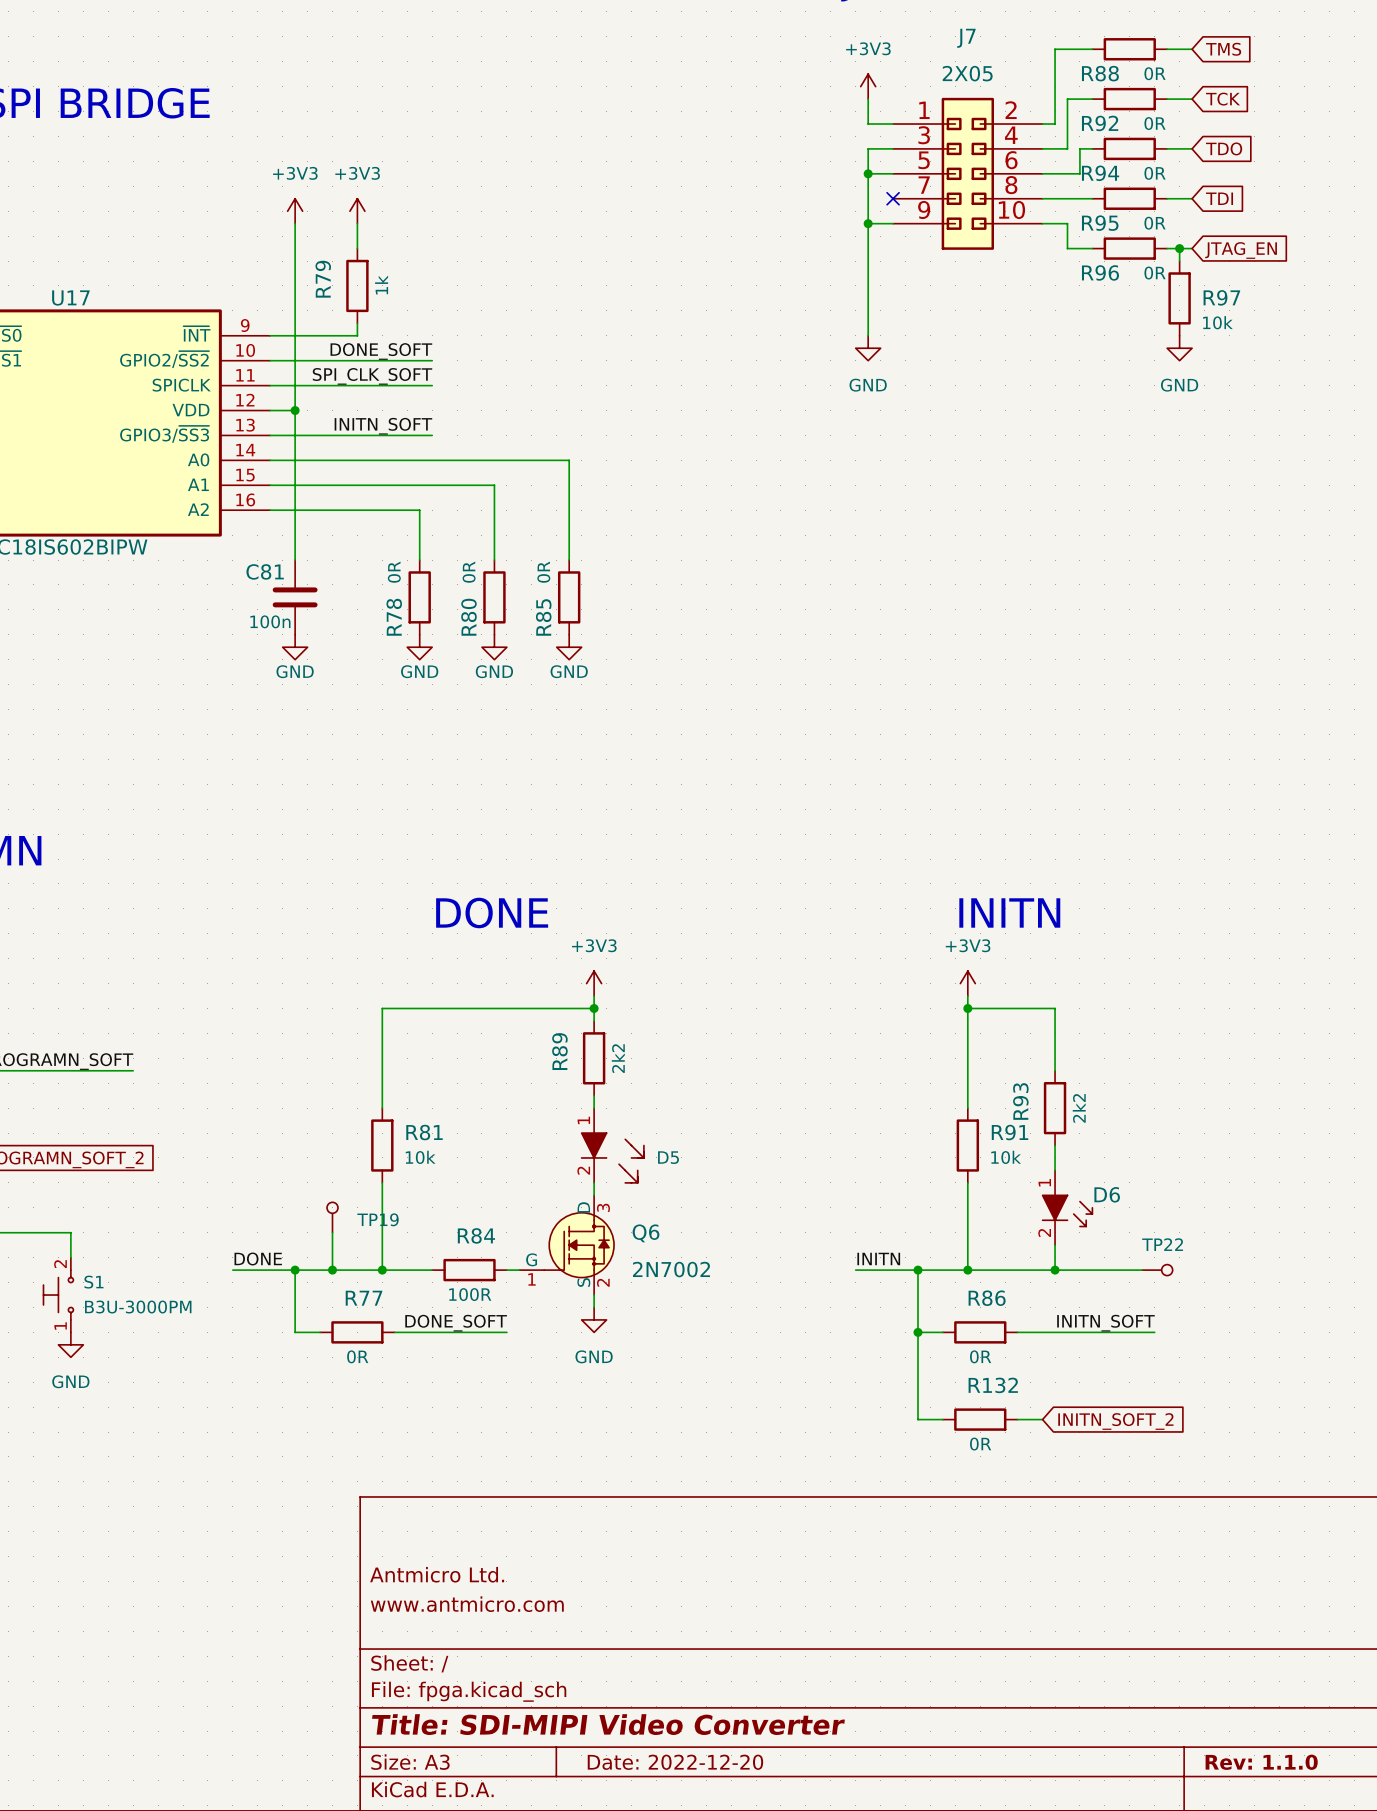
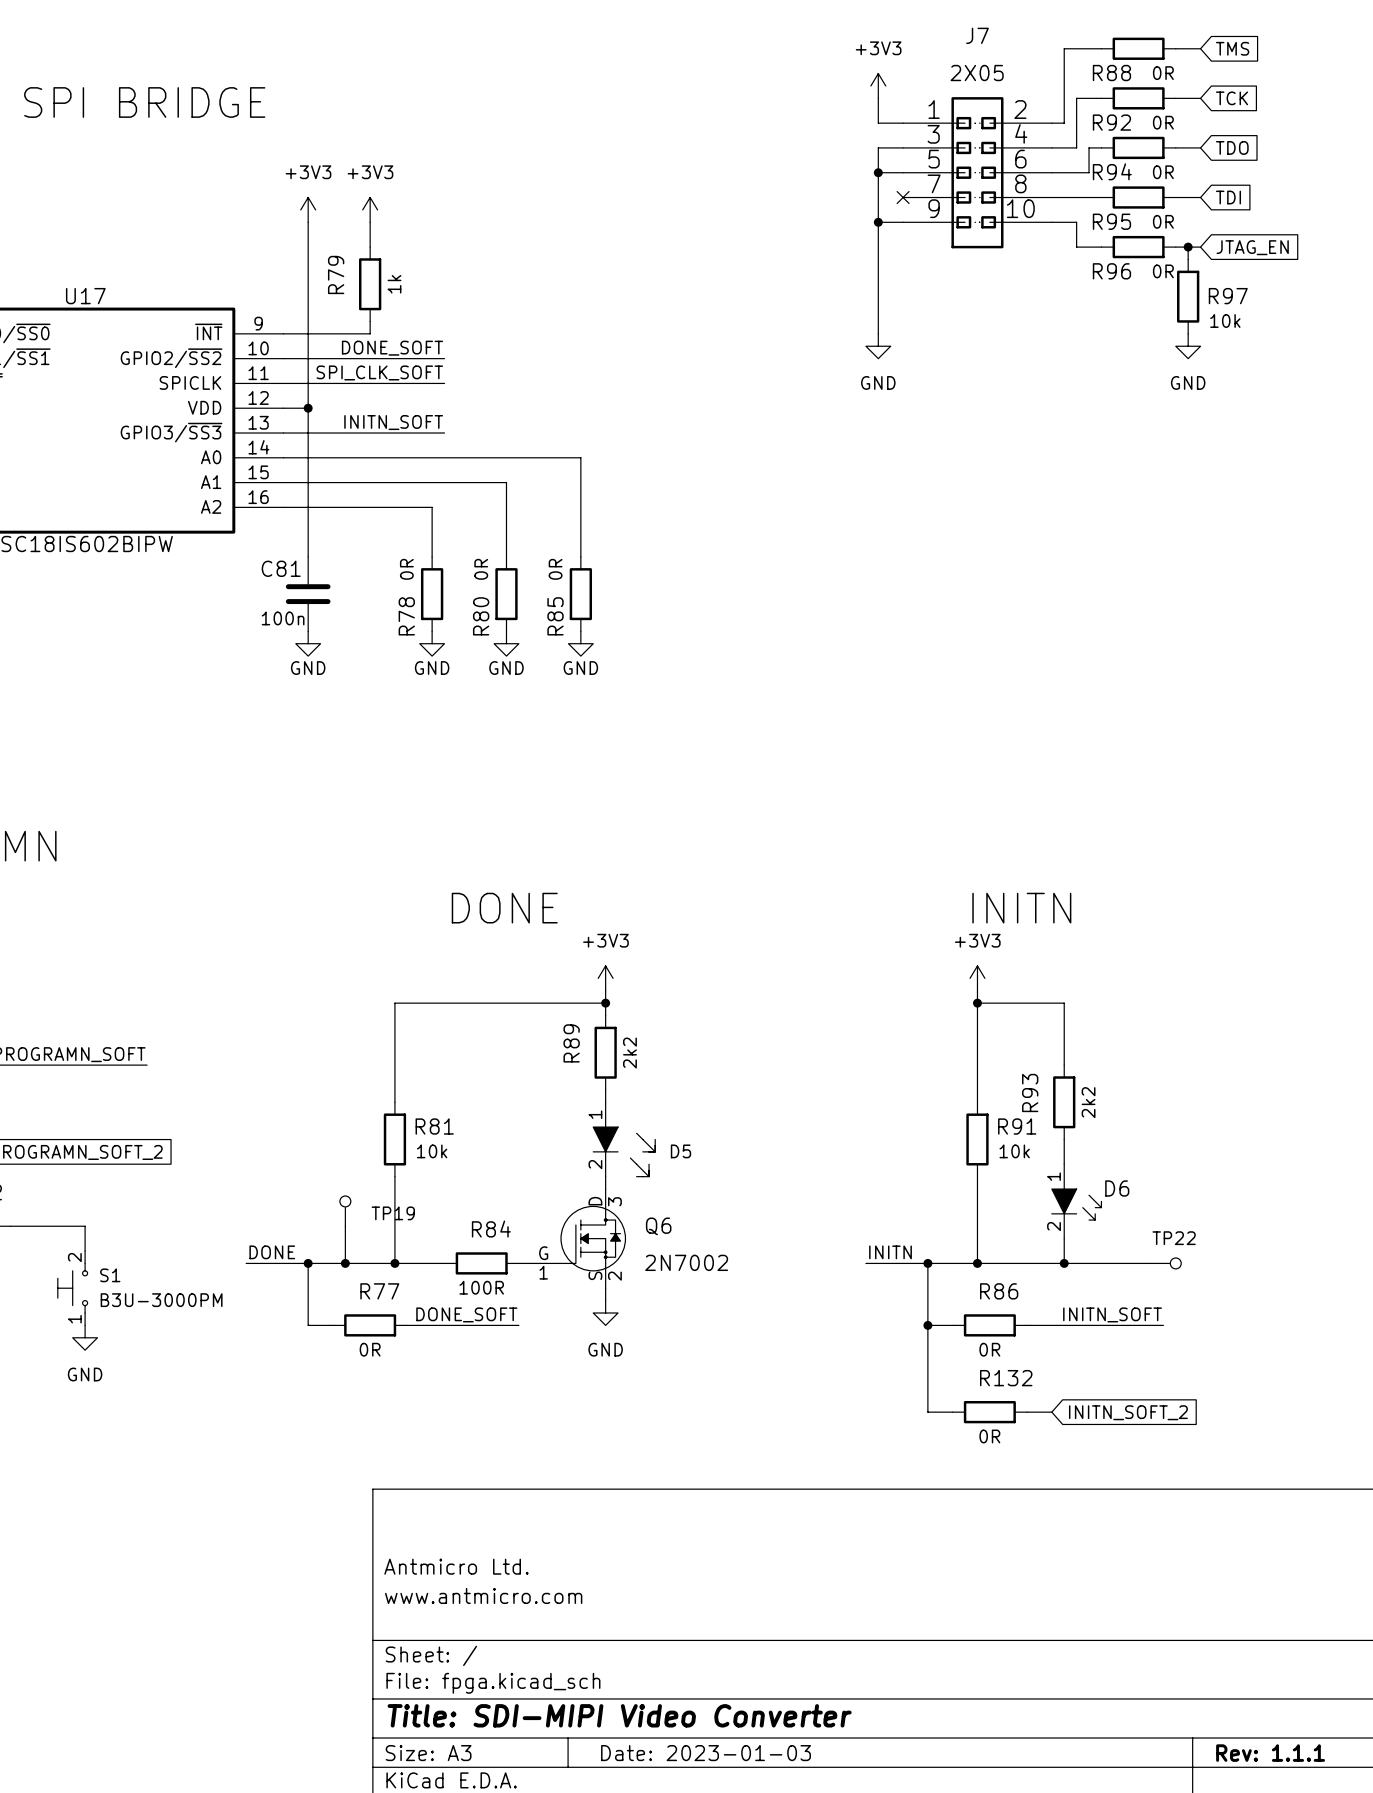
title block: Date: 2022-12-20 (675, 1762) -> Date: 2023-01-03 (706, 1753)
title block: Rev: 1.1.0 (1261, 1762) -> Rev: 1.1.1 (1270, 1753)

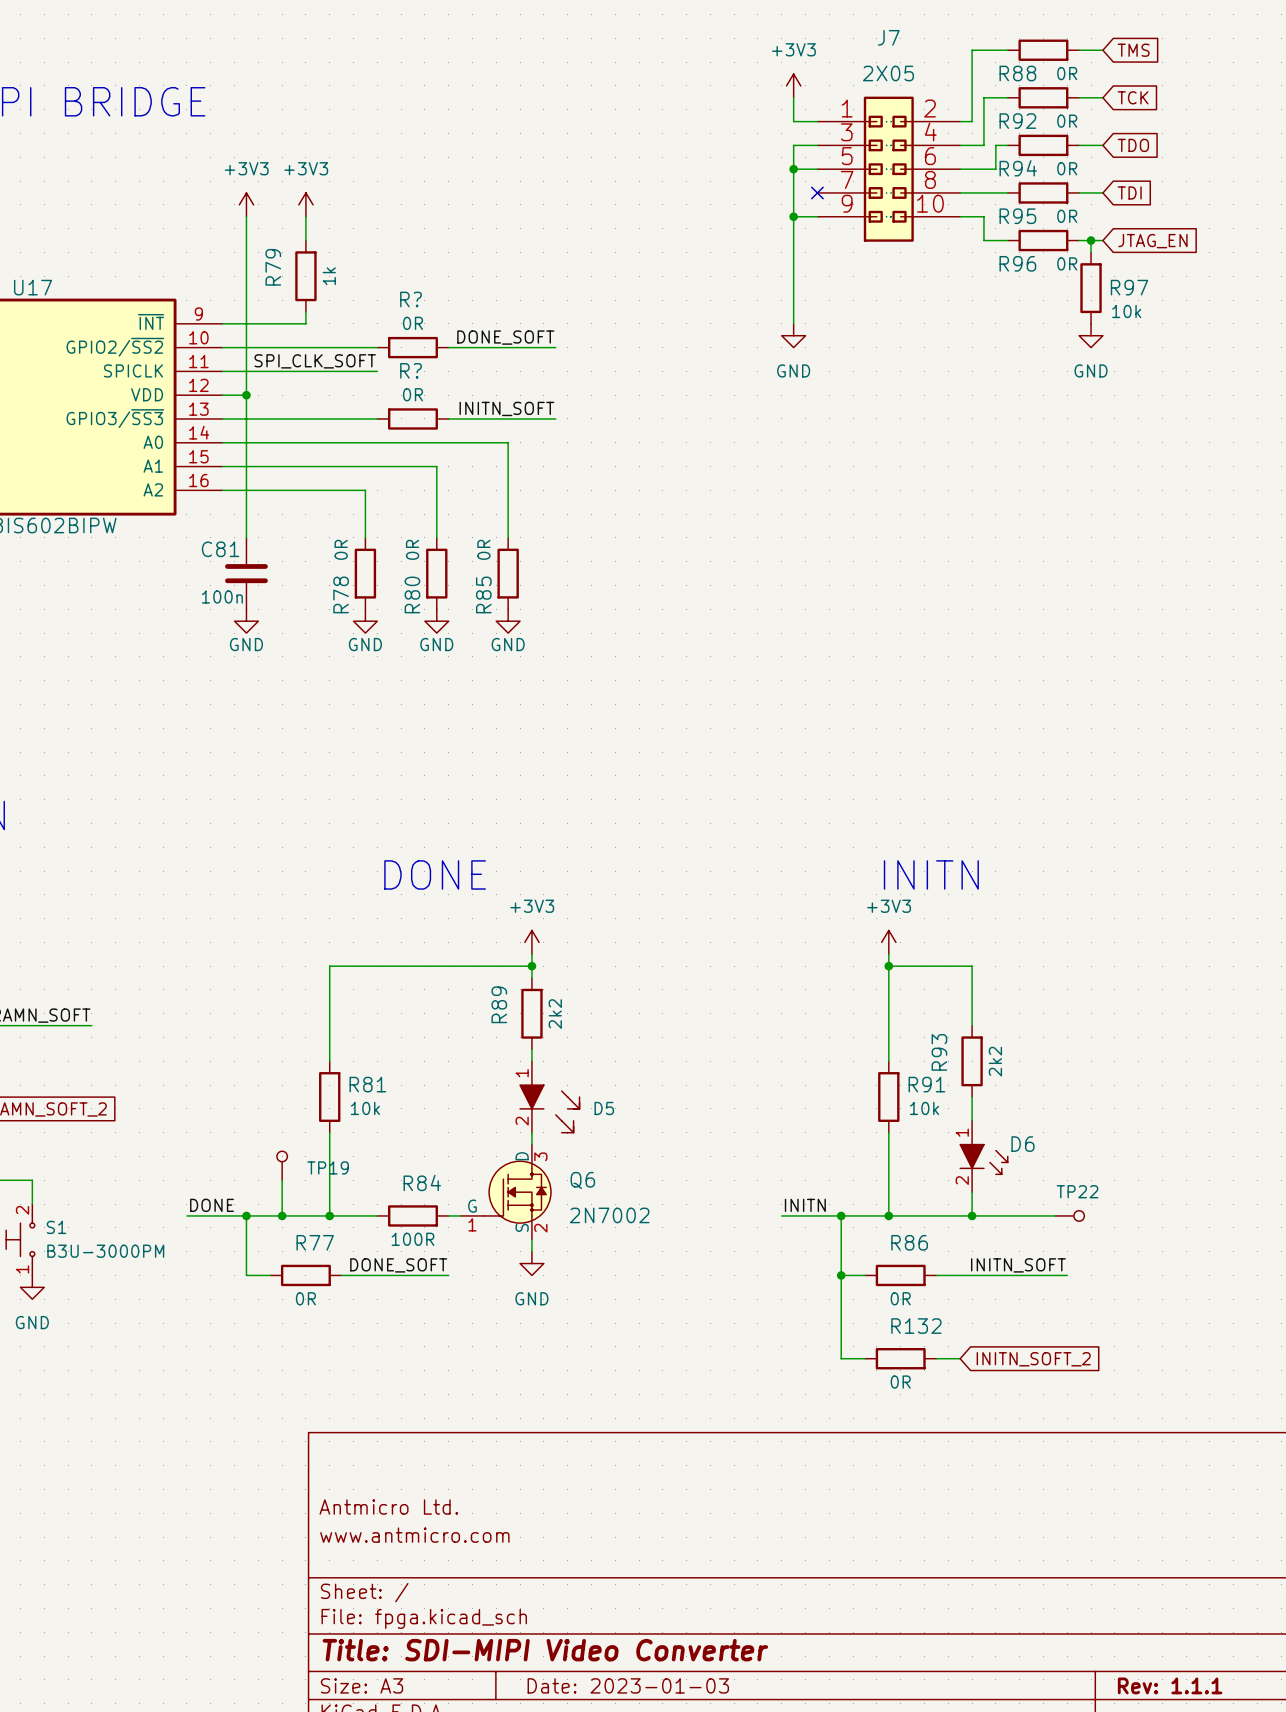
label position: DONE_SOFT (392, 348) -> DONE_SOFT (505, 337)
R?: none -> (412, 347)
wire: none -> (448, 347) (555, 347)
label position: INITN_SOFT (393, 422) -> INITN_SOFT (506, 408)
R?: none -> (412, 418)
wire: none -> (448, 418) (555, 418)

